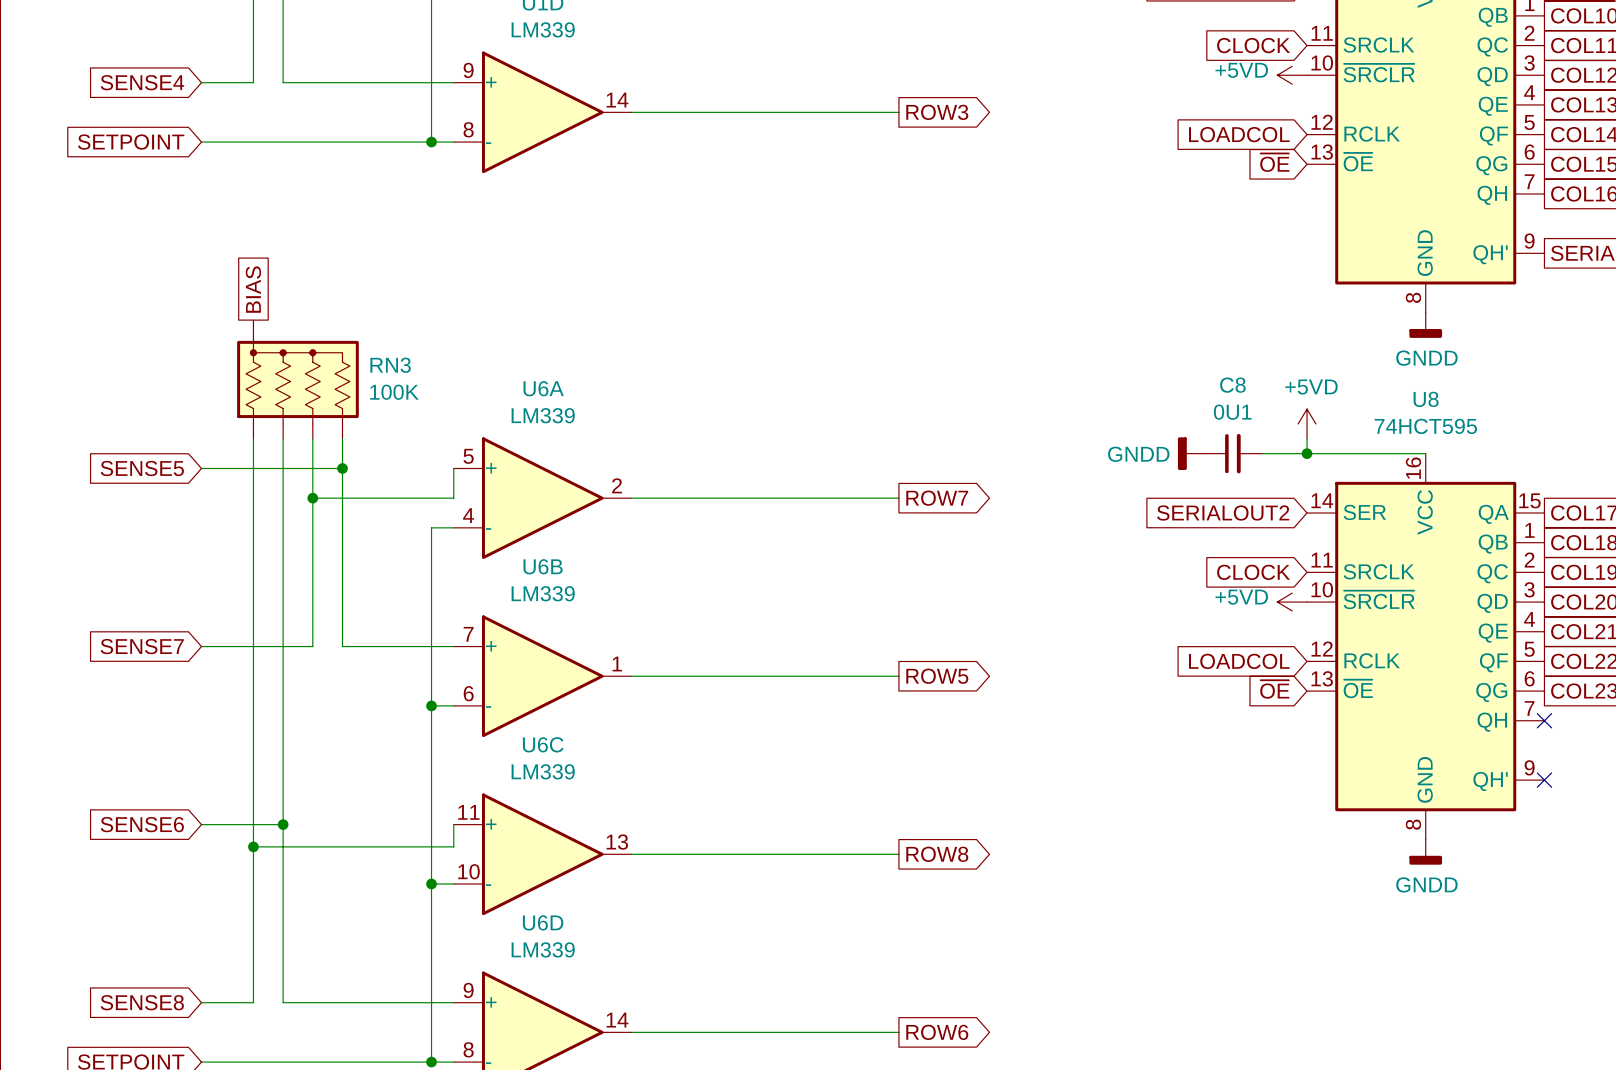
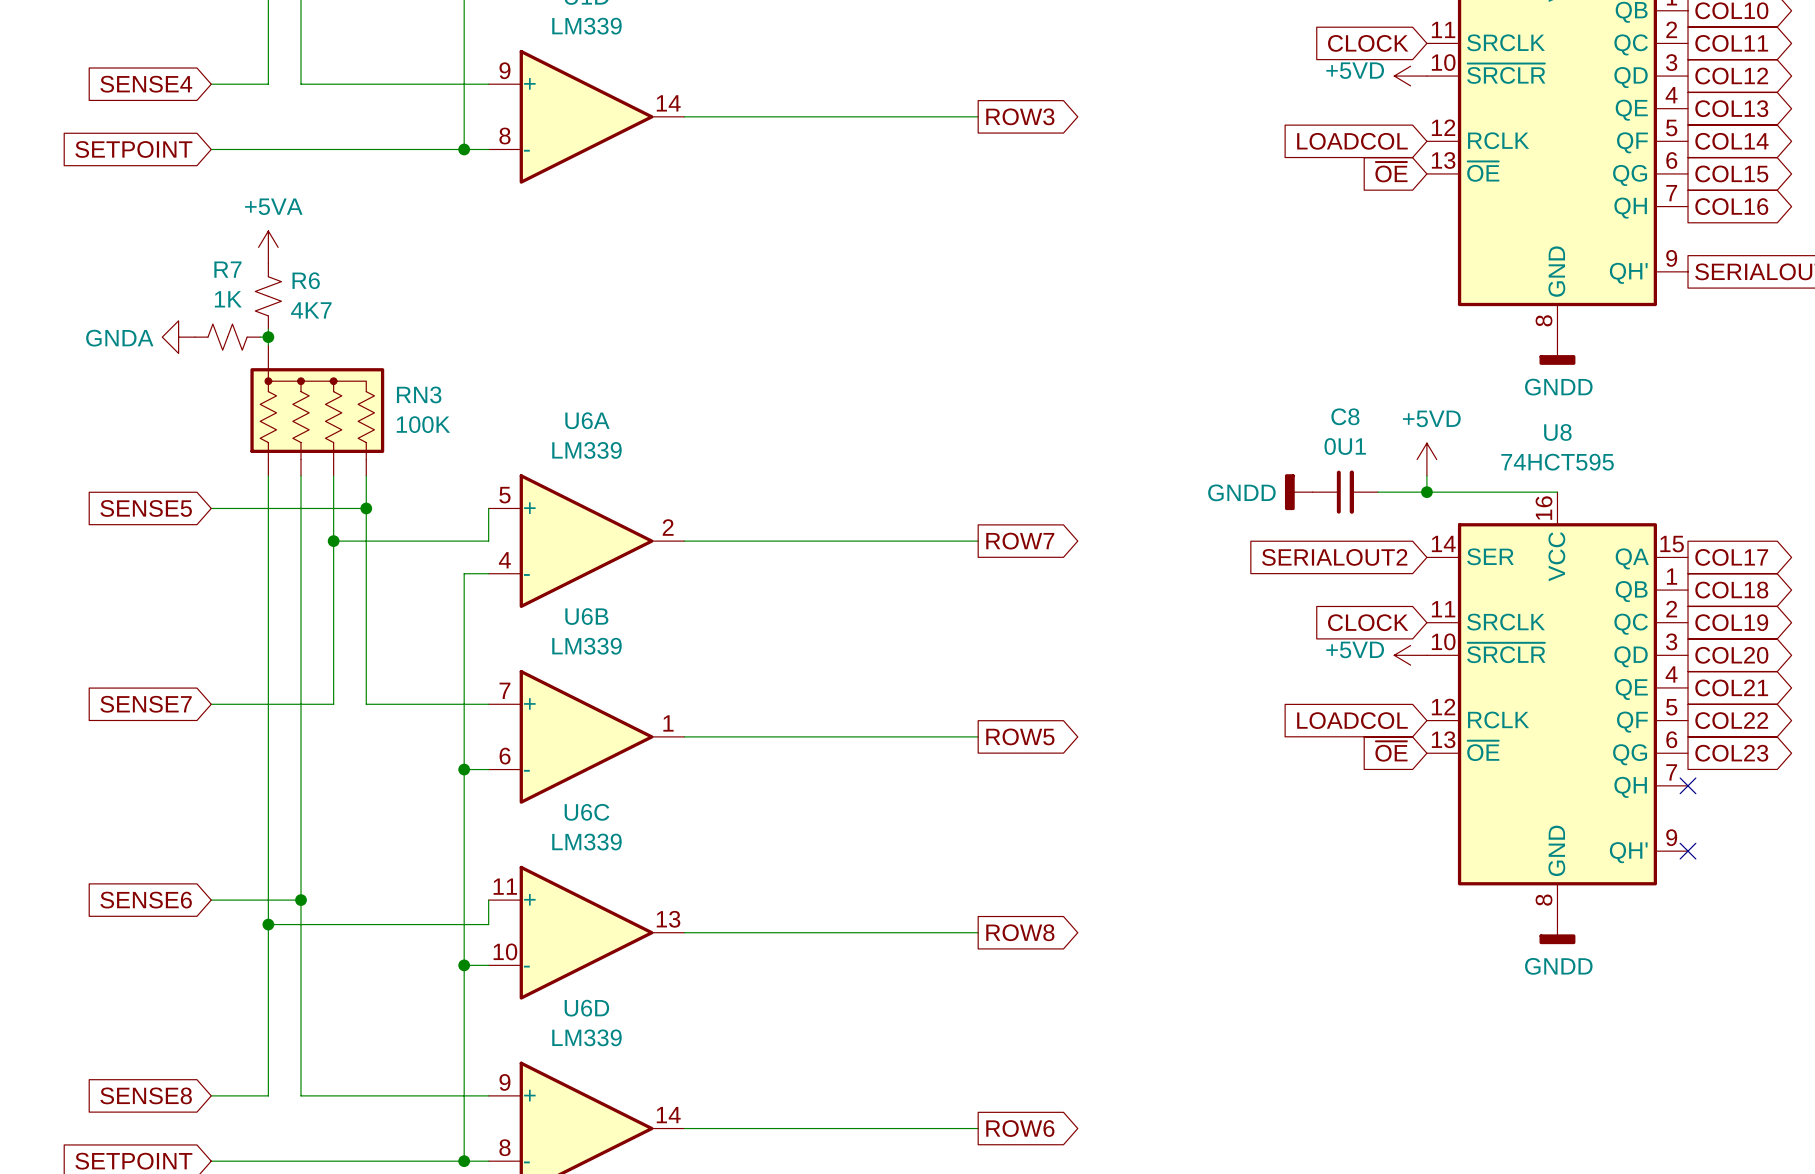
power symbol: none -> +5VA (268, 247)
R6: none -> 4K7 (268, 296)
global label: BIAS (253, 289) -> none
power symbol: none -> GNDA (178, 337)
R7: none -> 1K (227, 337)
junction: none -> (268, 337)

